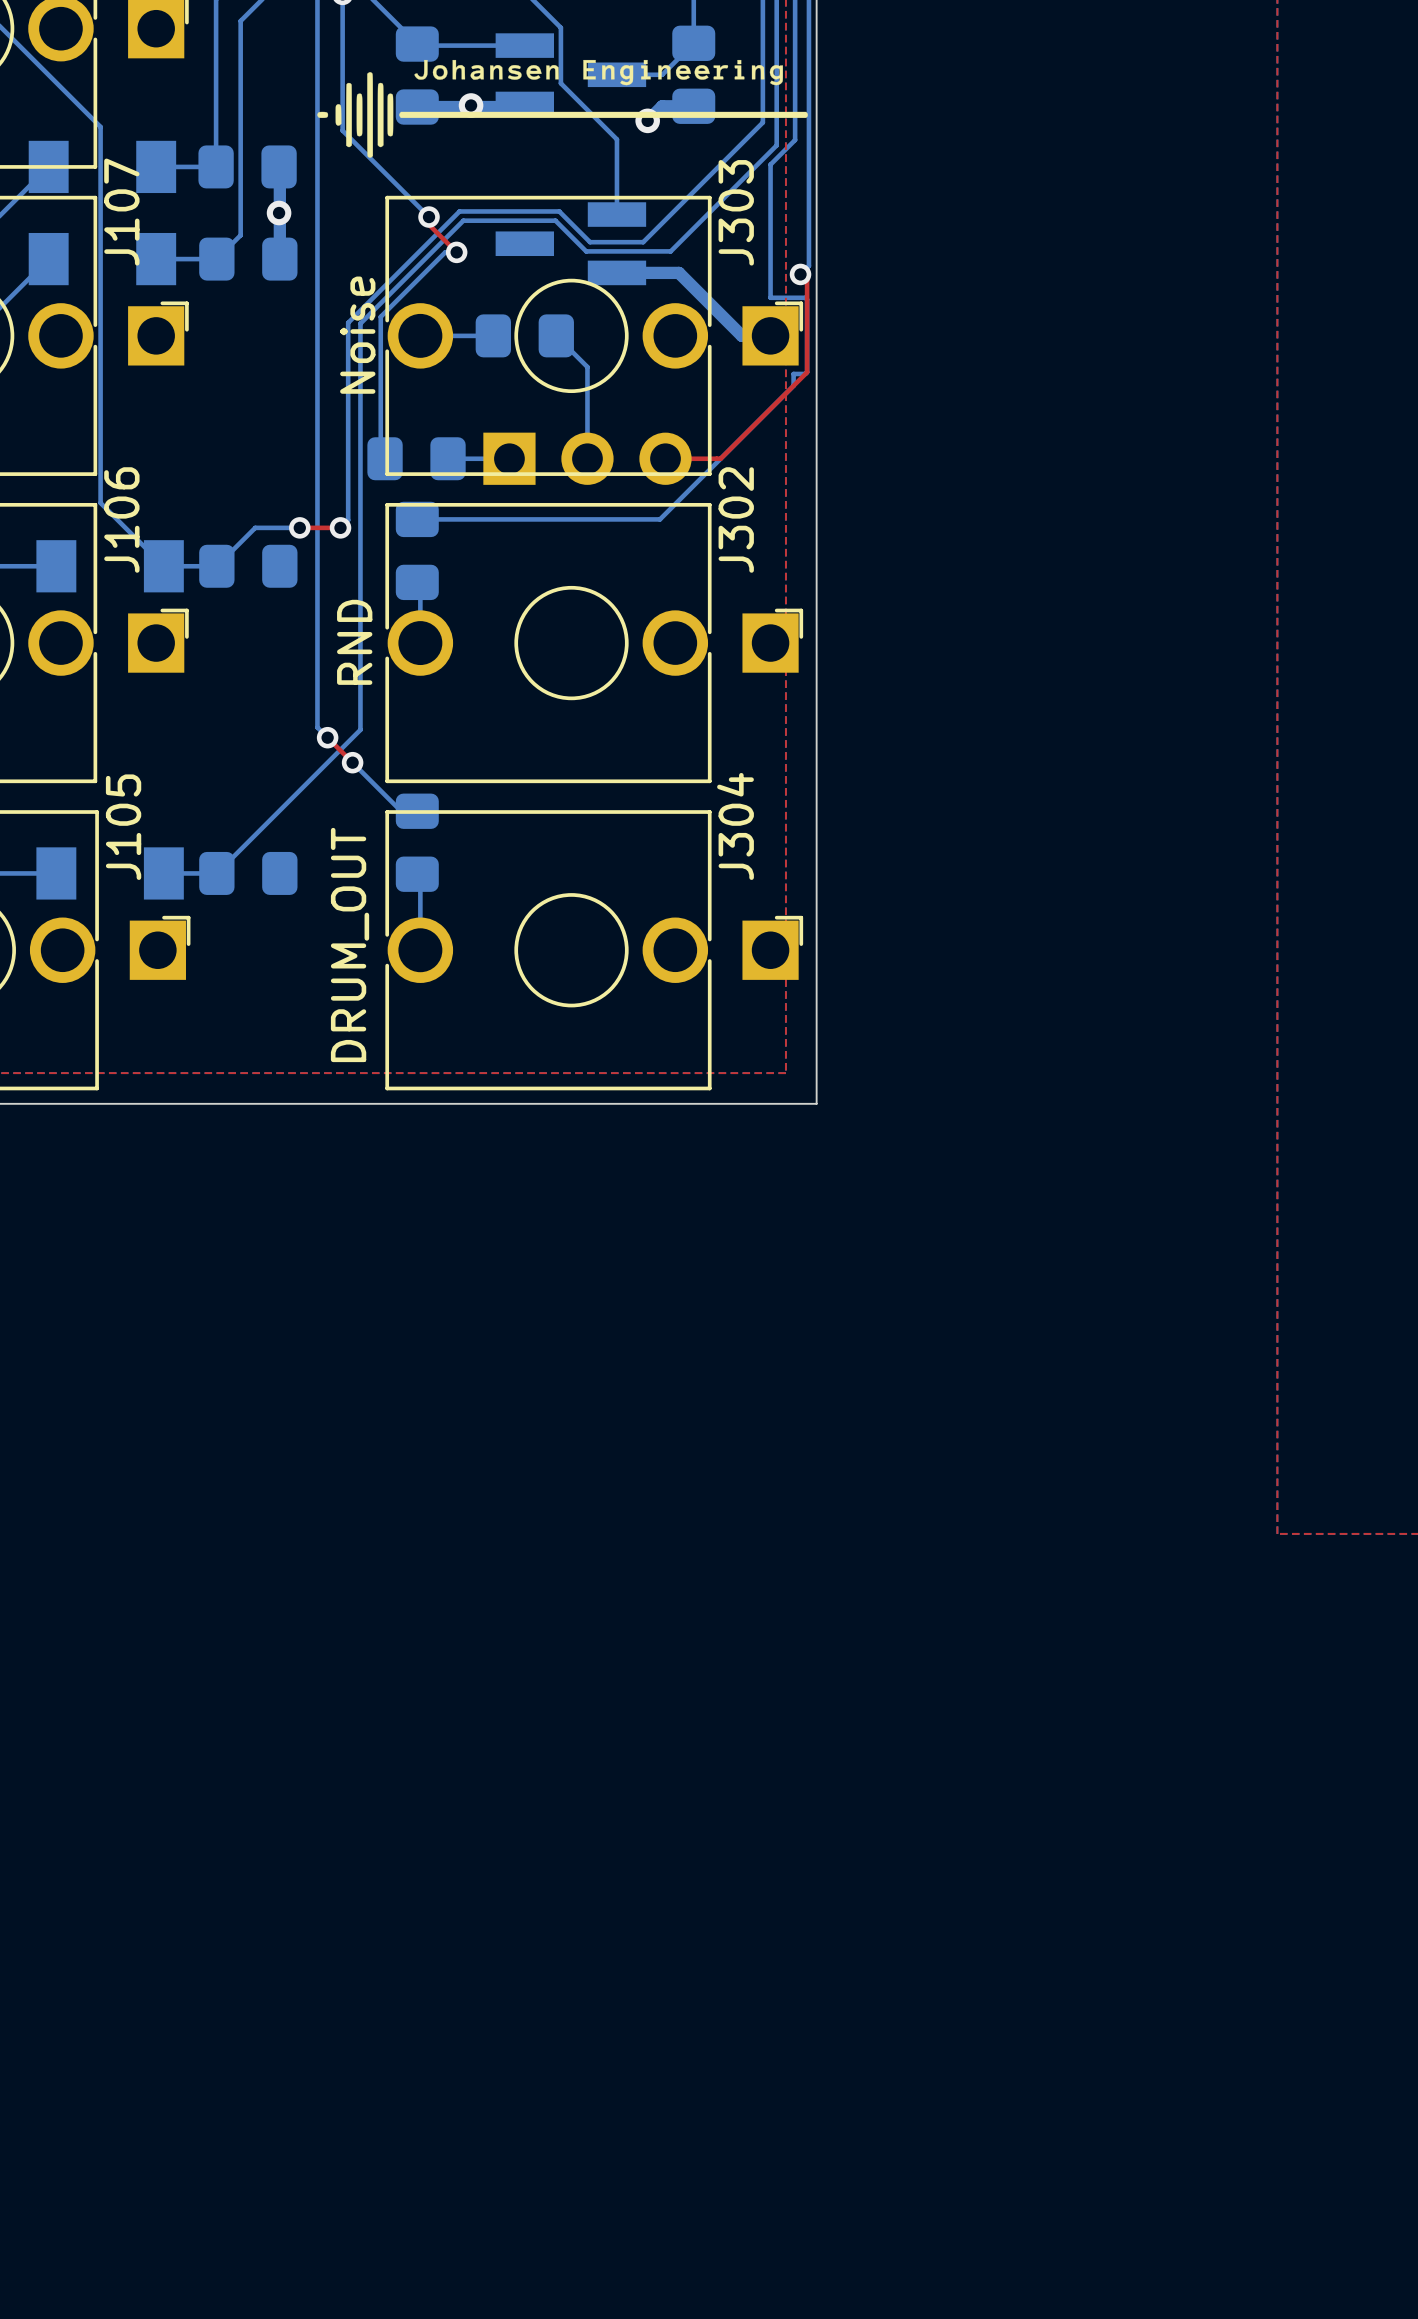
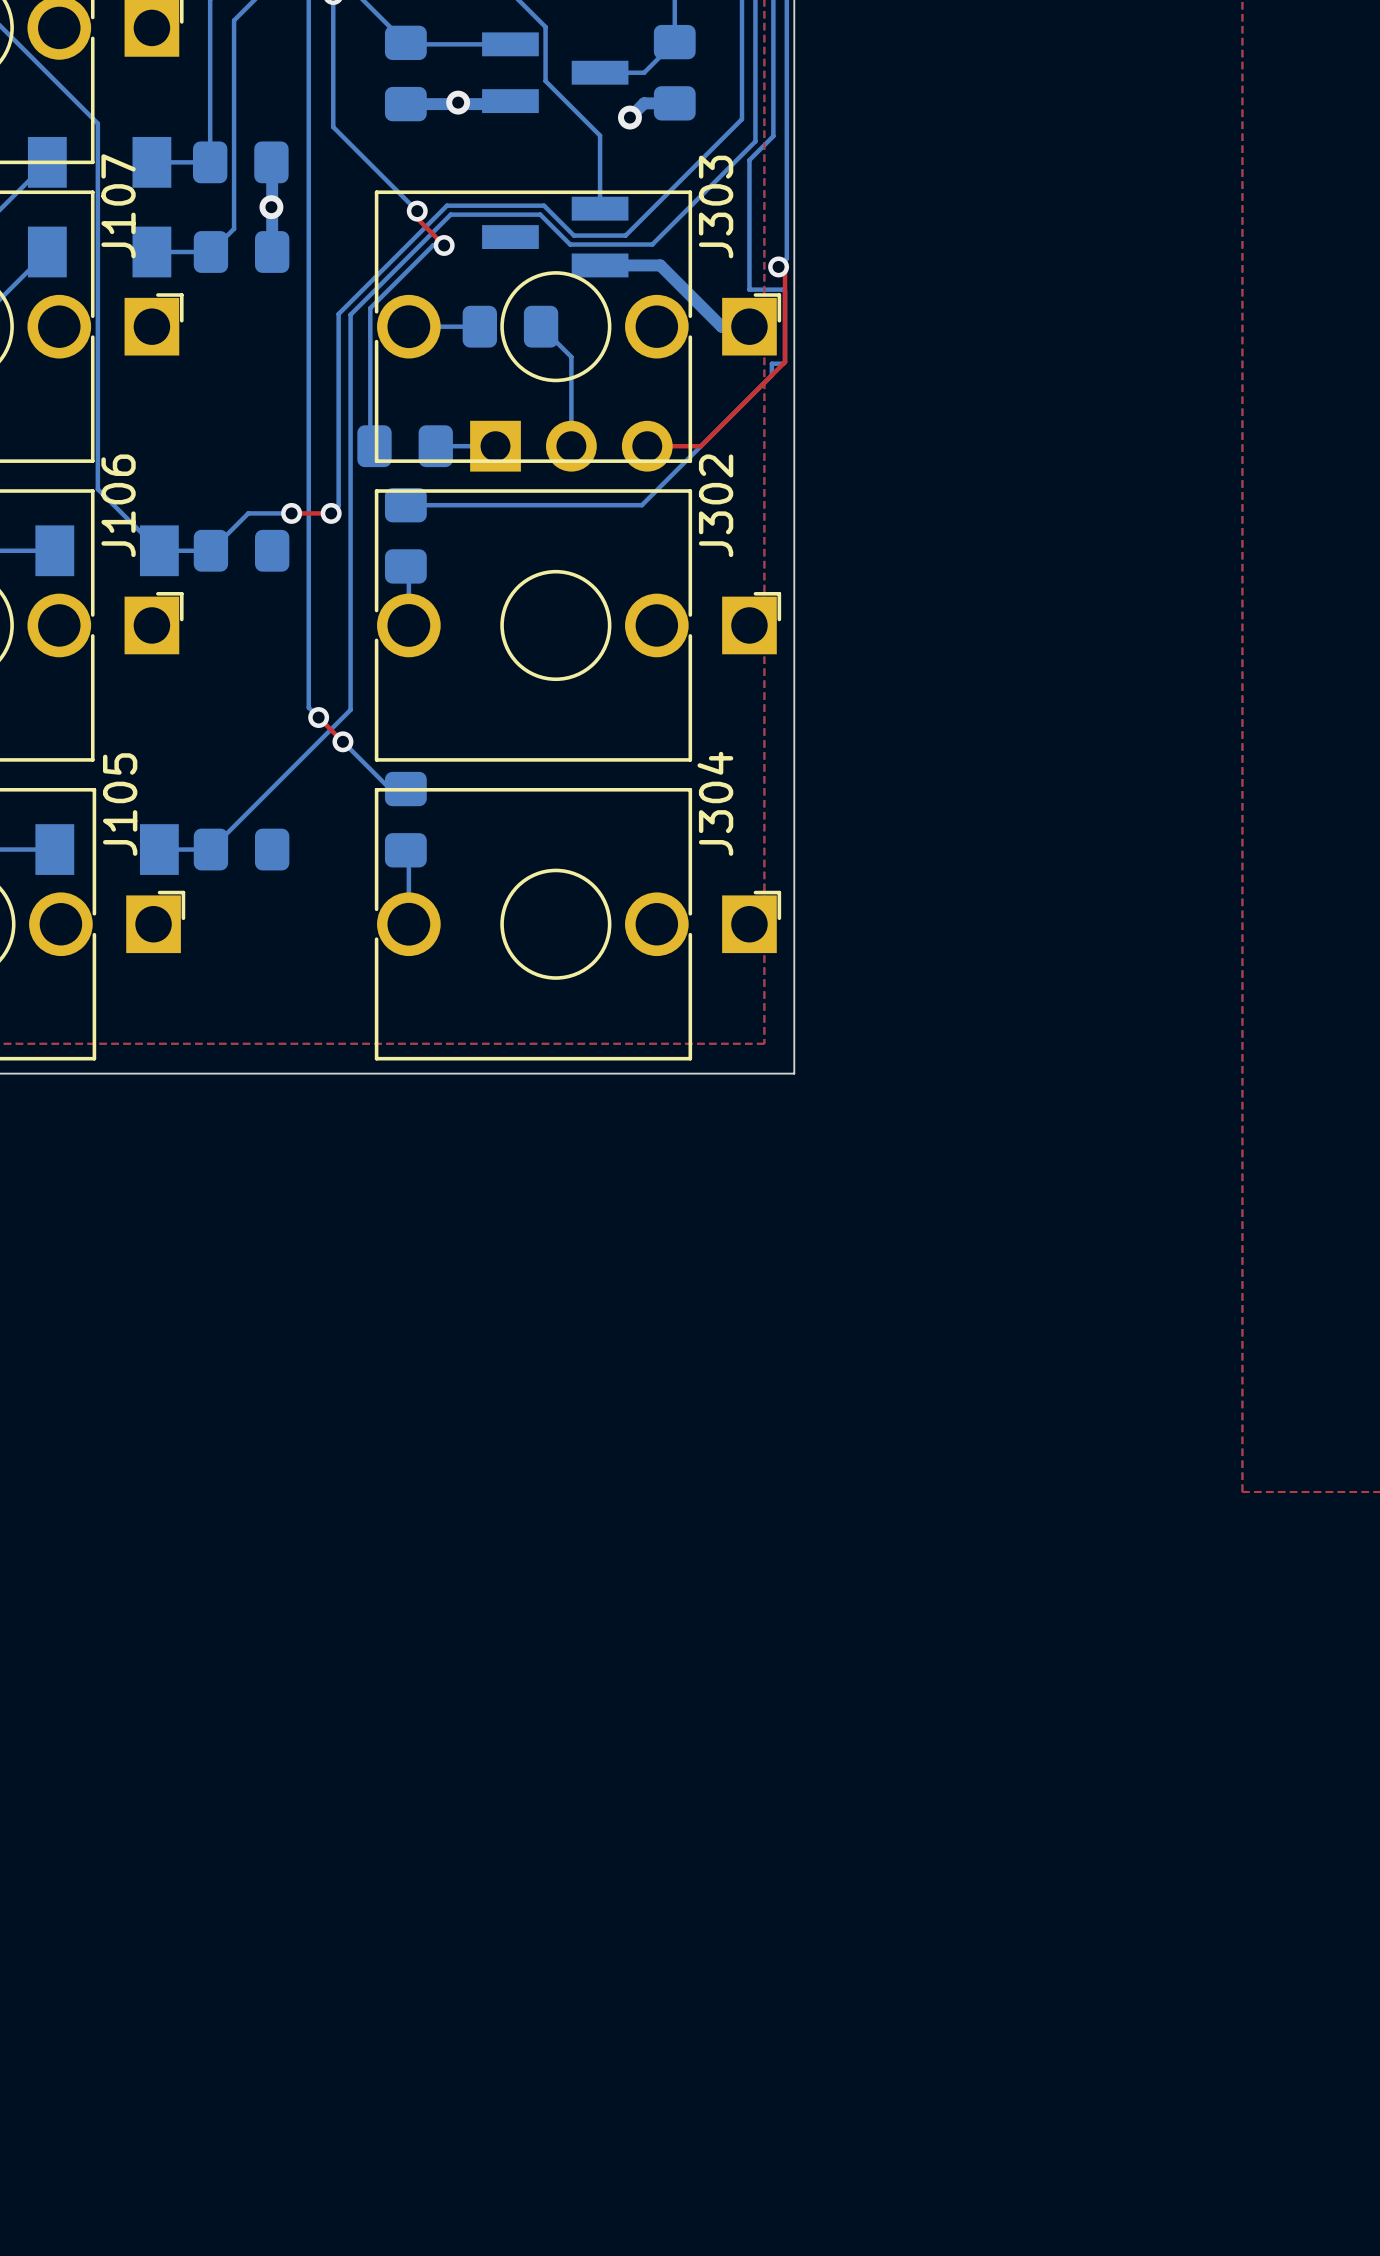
drawing: [317, 59, 808, 158] -> none
J303 value: Noise (357, 335) -> none
J302 value: RND (354, 642) -> none
J304 value: DRUM_OUT (350, 944) -> none

